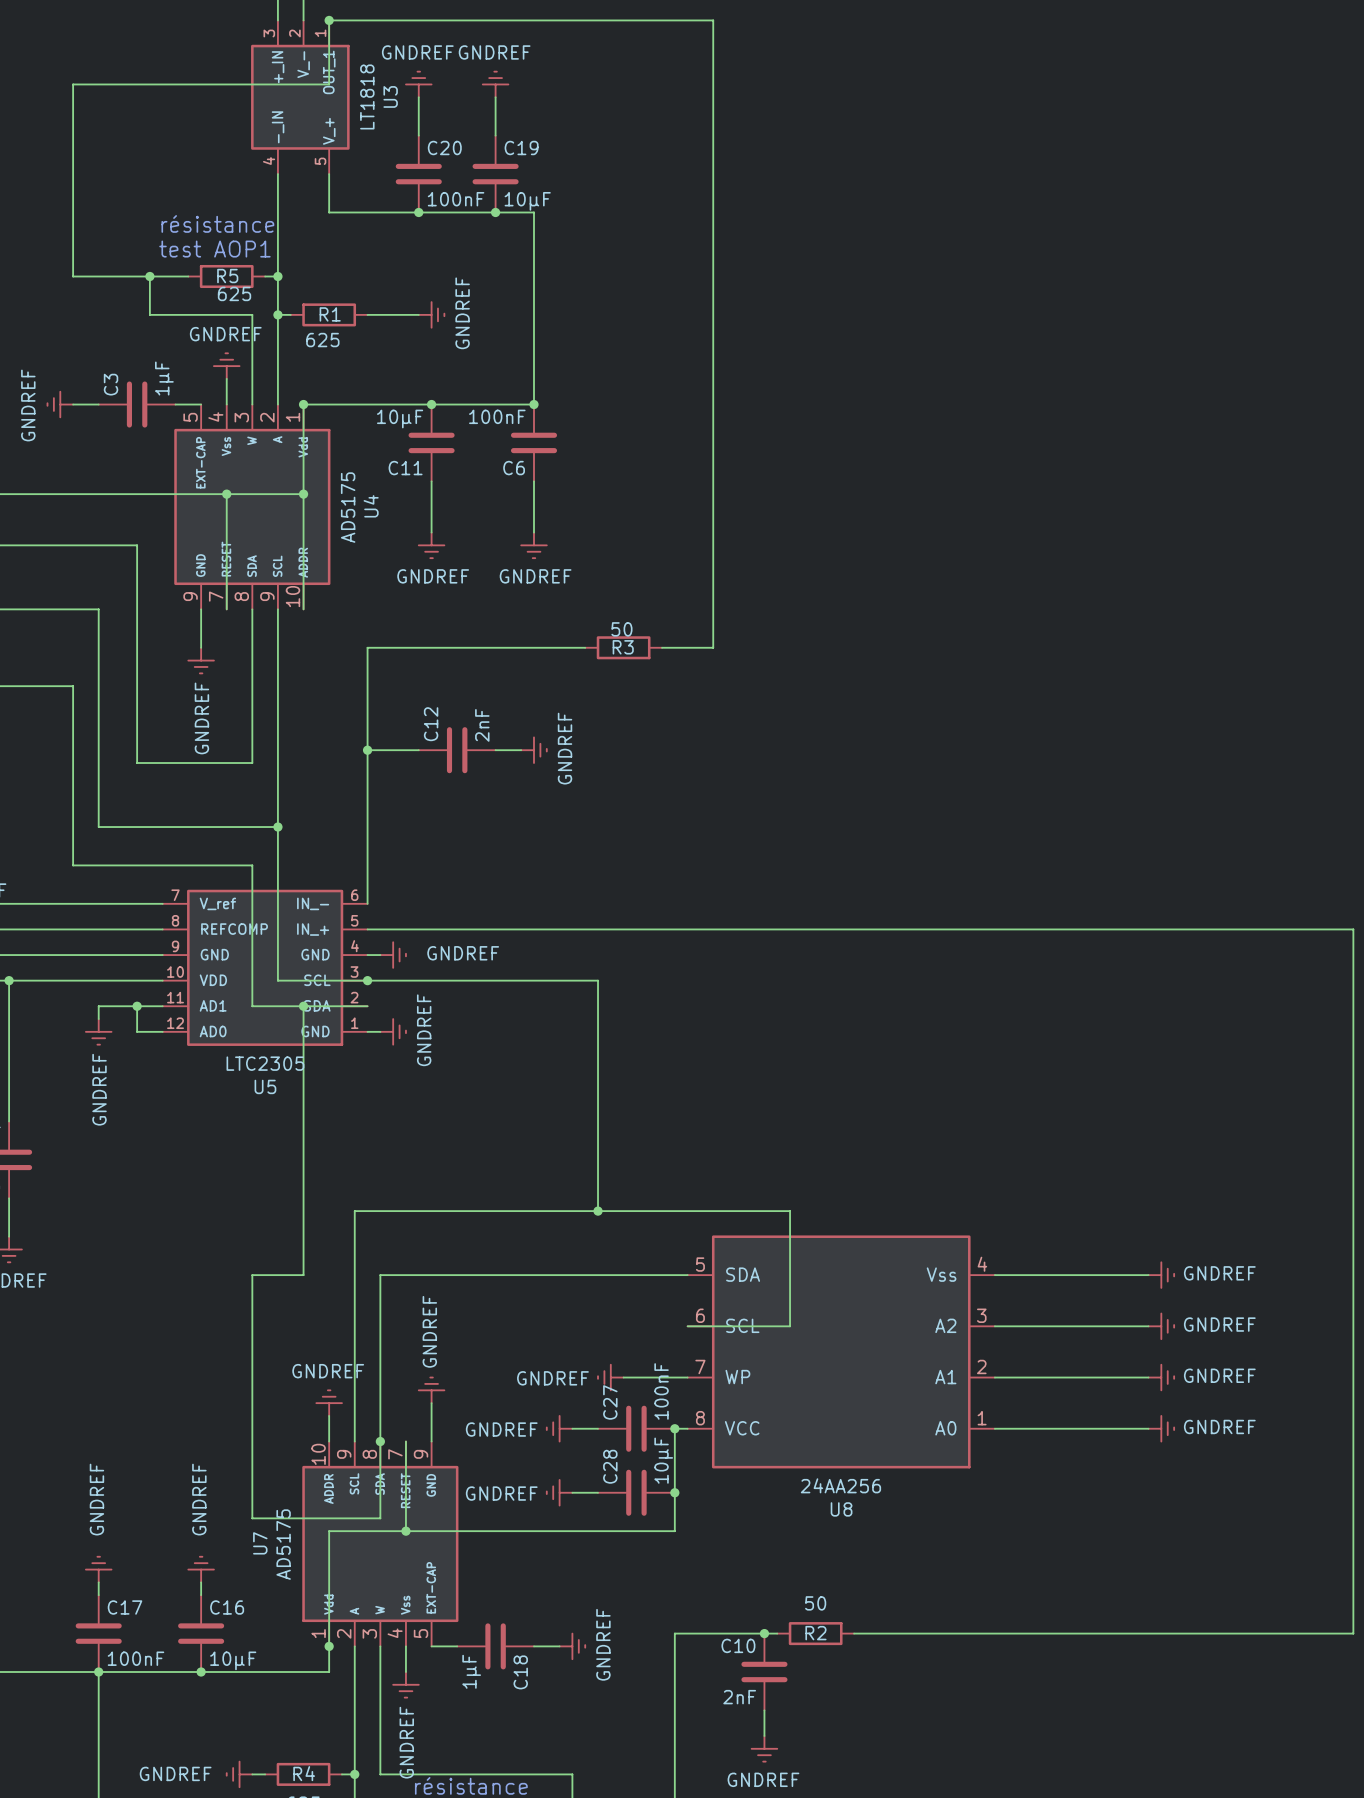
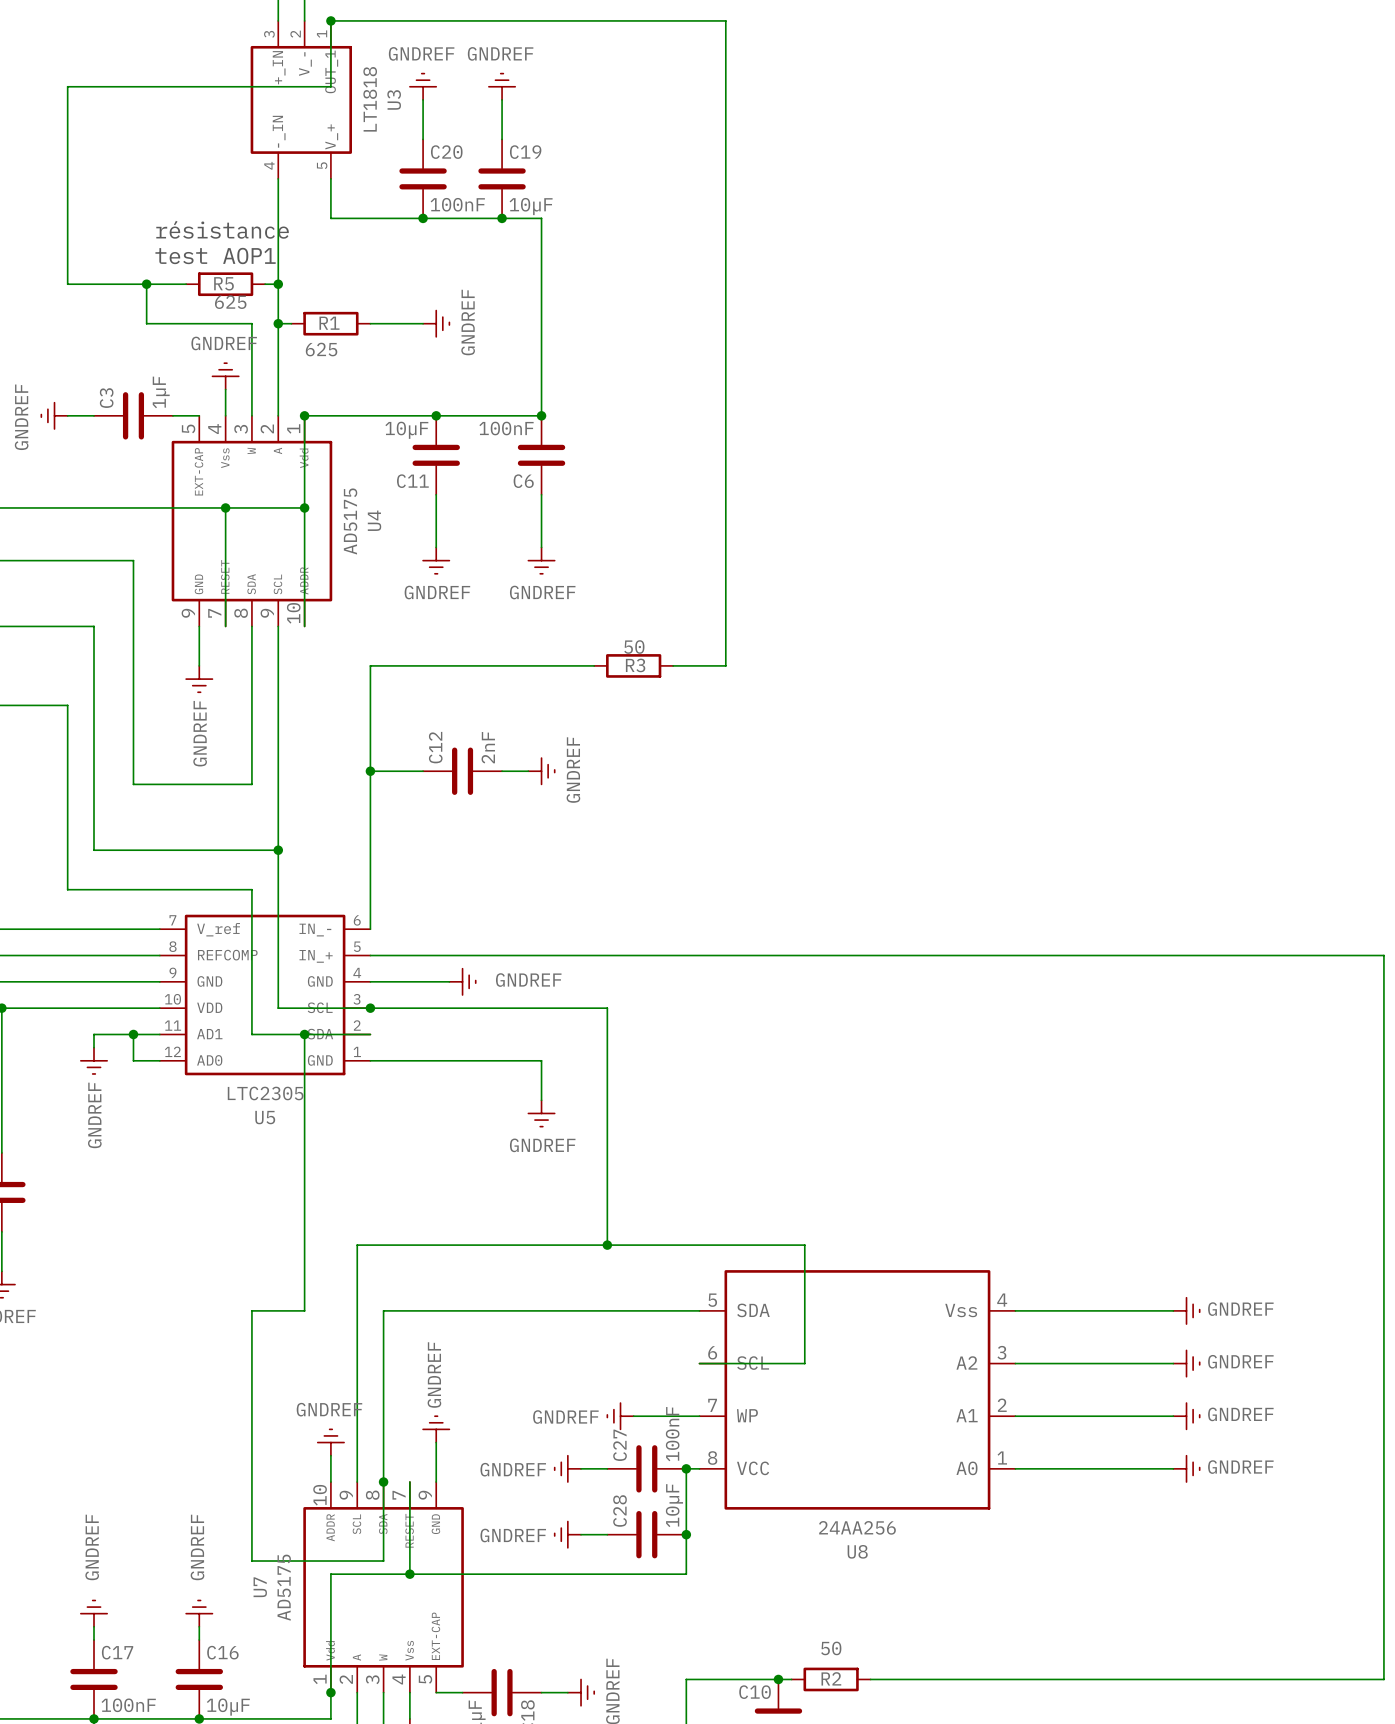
wire: none -> (383, 981) (449, 981)
power symbol: GNDREF (393, 955) -> none
power symbol: none -> GNDREF (462, 981)
wire: none -> (383, 1060) (541, 1060) (541, 1100)
power symbol: GNDREF (393, 1031) -> none
power symbol: none -> GNDREF (541, 1113)

